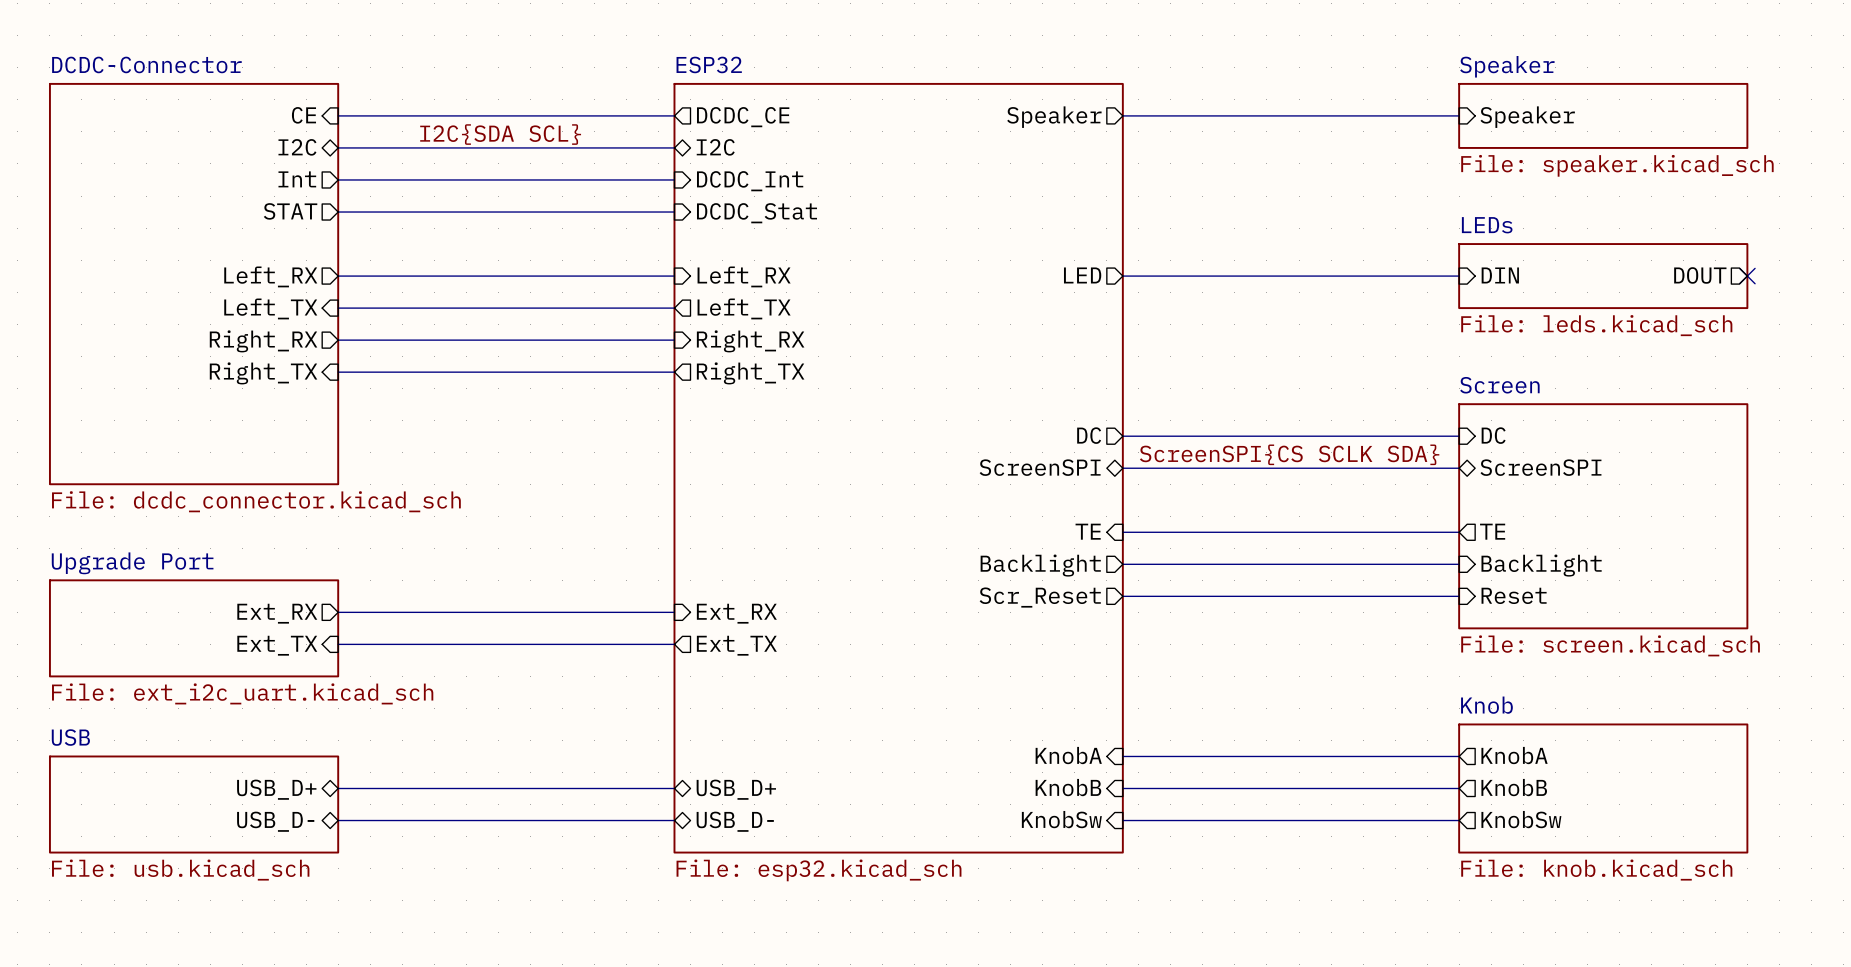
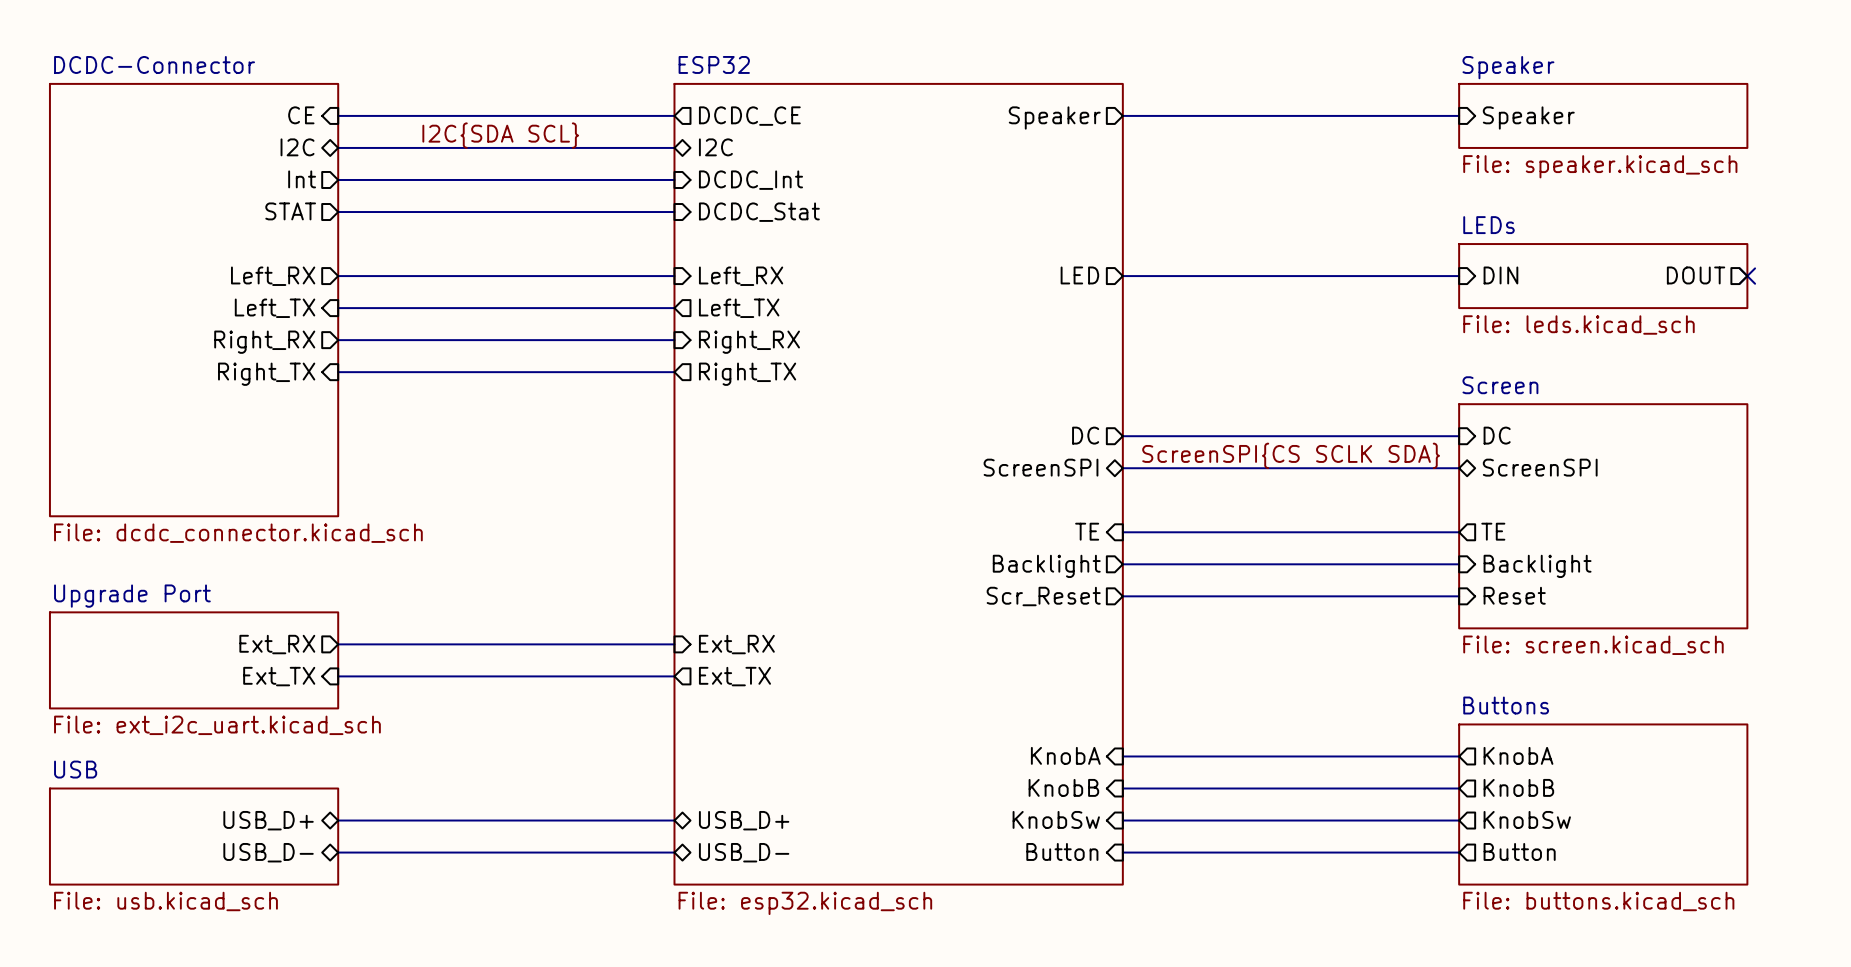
sheet ESP32 shape: [673, 82, 1124, 854] -> [673, 82, 1124, 886]
sheet DCDC-Connector: File: dcdc_connector.kicad_sch (194, 284) -> none
sheet DCDC-Connector: none -> File: dcdc_connector.kicad_sch (194, 300)
wire: (338, 612) (674, 612) -> (338, 676) (674, 676)
sheet pin: Ext_RX (277, 613) -> none
sheet pin: Ext_RX (736, 613) -> none
sheet Upgrade Port position: (194, 628) -> (194, 660)
sheet pin shape: input (277, 645) -> output (277, 644)
sheet pin: Ext_TX (277, 645) -> Ext_RX (277, 644)
sheet pin shape: output (736, 645) -> input (736, 644)
sheet pin: Ext_TX (736, 645) -> Ext_RX (736, 644)
sheet pin: none -> Ext_TX (279, 676)
sheet pin: none -> Ext_TX (734, 676)
wire: (338, 788) (674, 788) -> (338, 852) (674, 852)
sheet Knob: File: knob.kicad_sch (1603, 788) -> none
sheet pin: USB_D+ (276, 789) -> none
sheet pin: USB_D+ (736, 789) -> none
sheet USB position: (194, 804) -> (194, 836)
sheet Buttons: none -> File: buttons.kicad_sch (1603, 804)
sheet pin: USB_D- (275, 821) -> USB_D+ (268, 820)
sheet pin: USB_D- (735, 821) -> USB_D+ (744, 820)
sheet pin: none -> Button (1062, 851)
wire: none -> (1122, 852) (1459, 852)
sheet pin: none -> Button (1519, 851)
sheet pin: none -> USB_D- (268, 852)
sheet pin: none -> USB_D- (744, 852)

